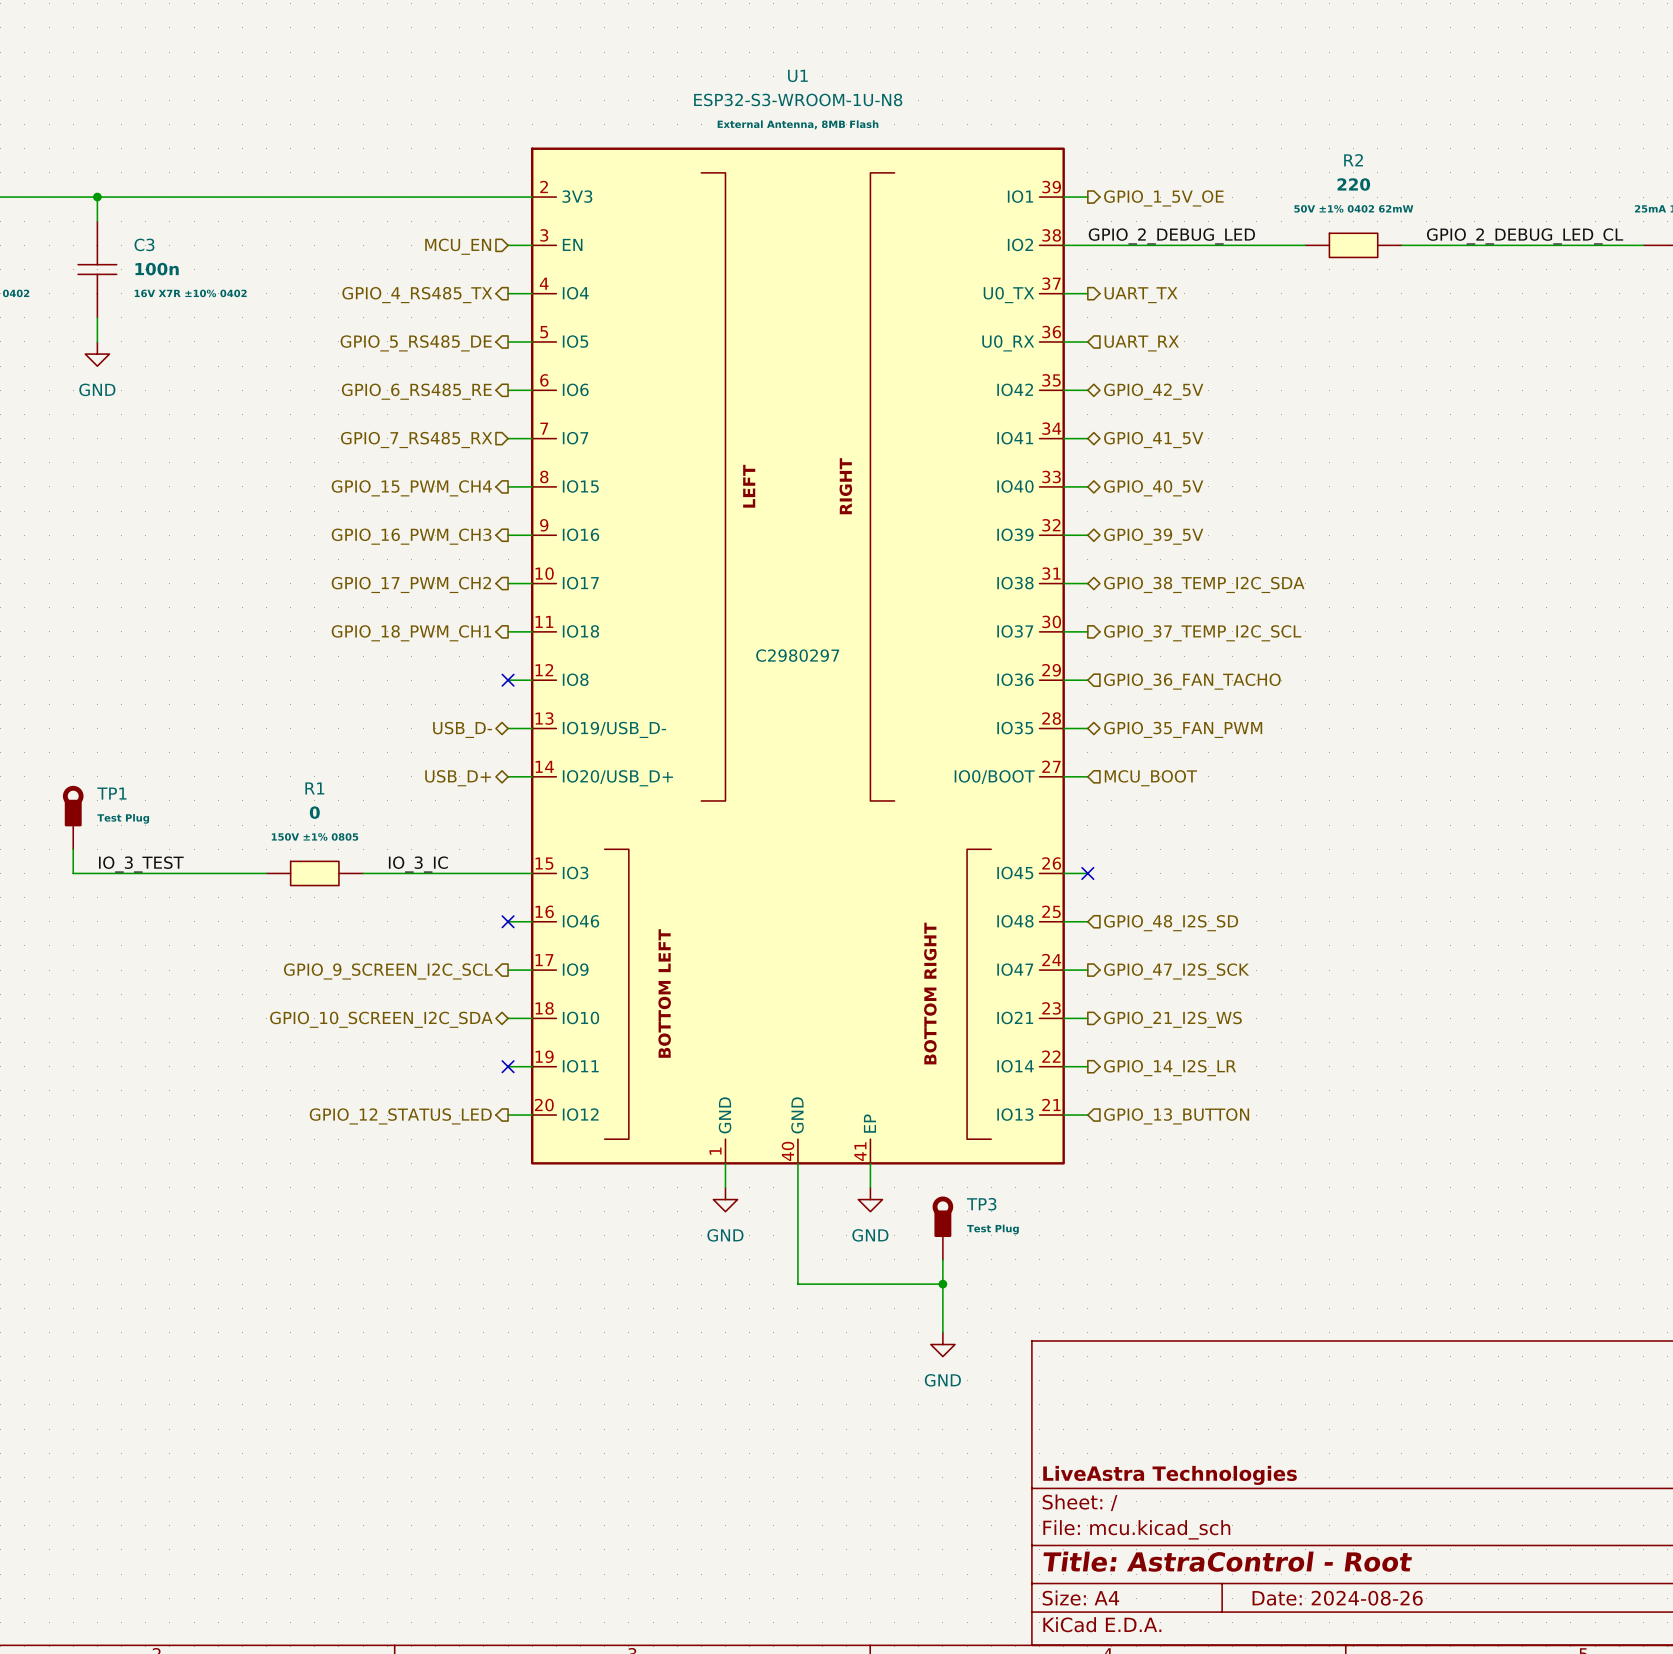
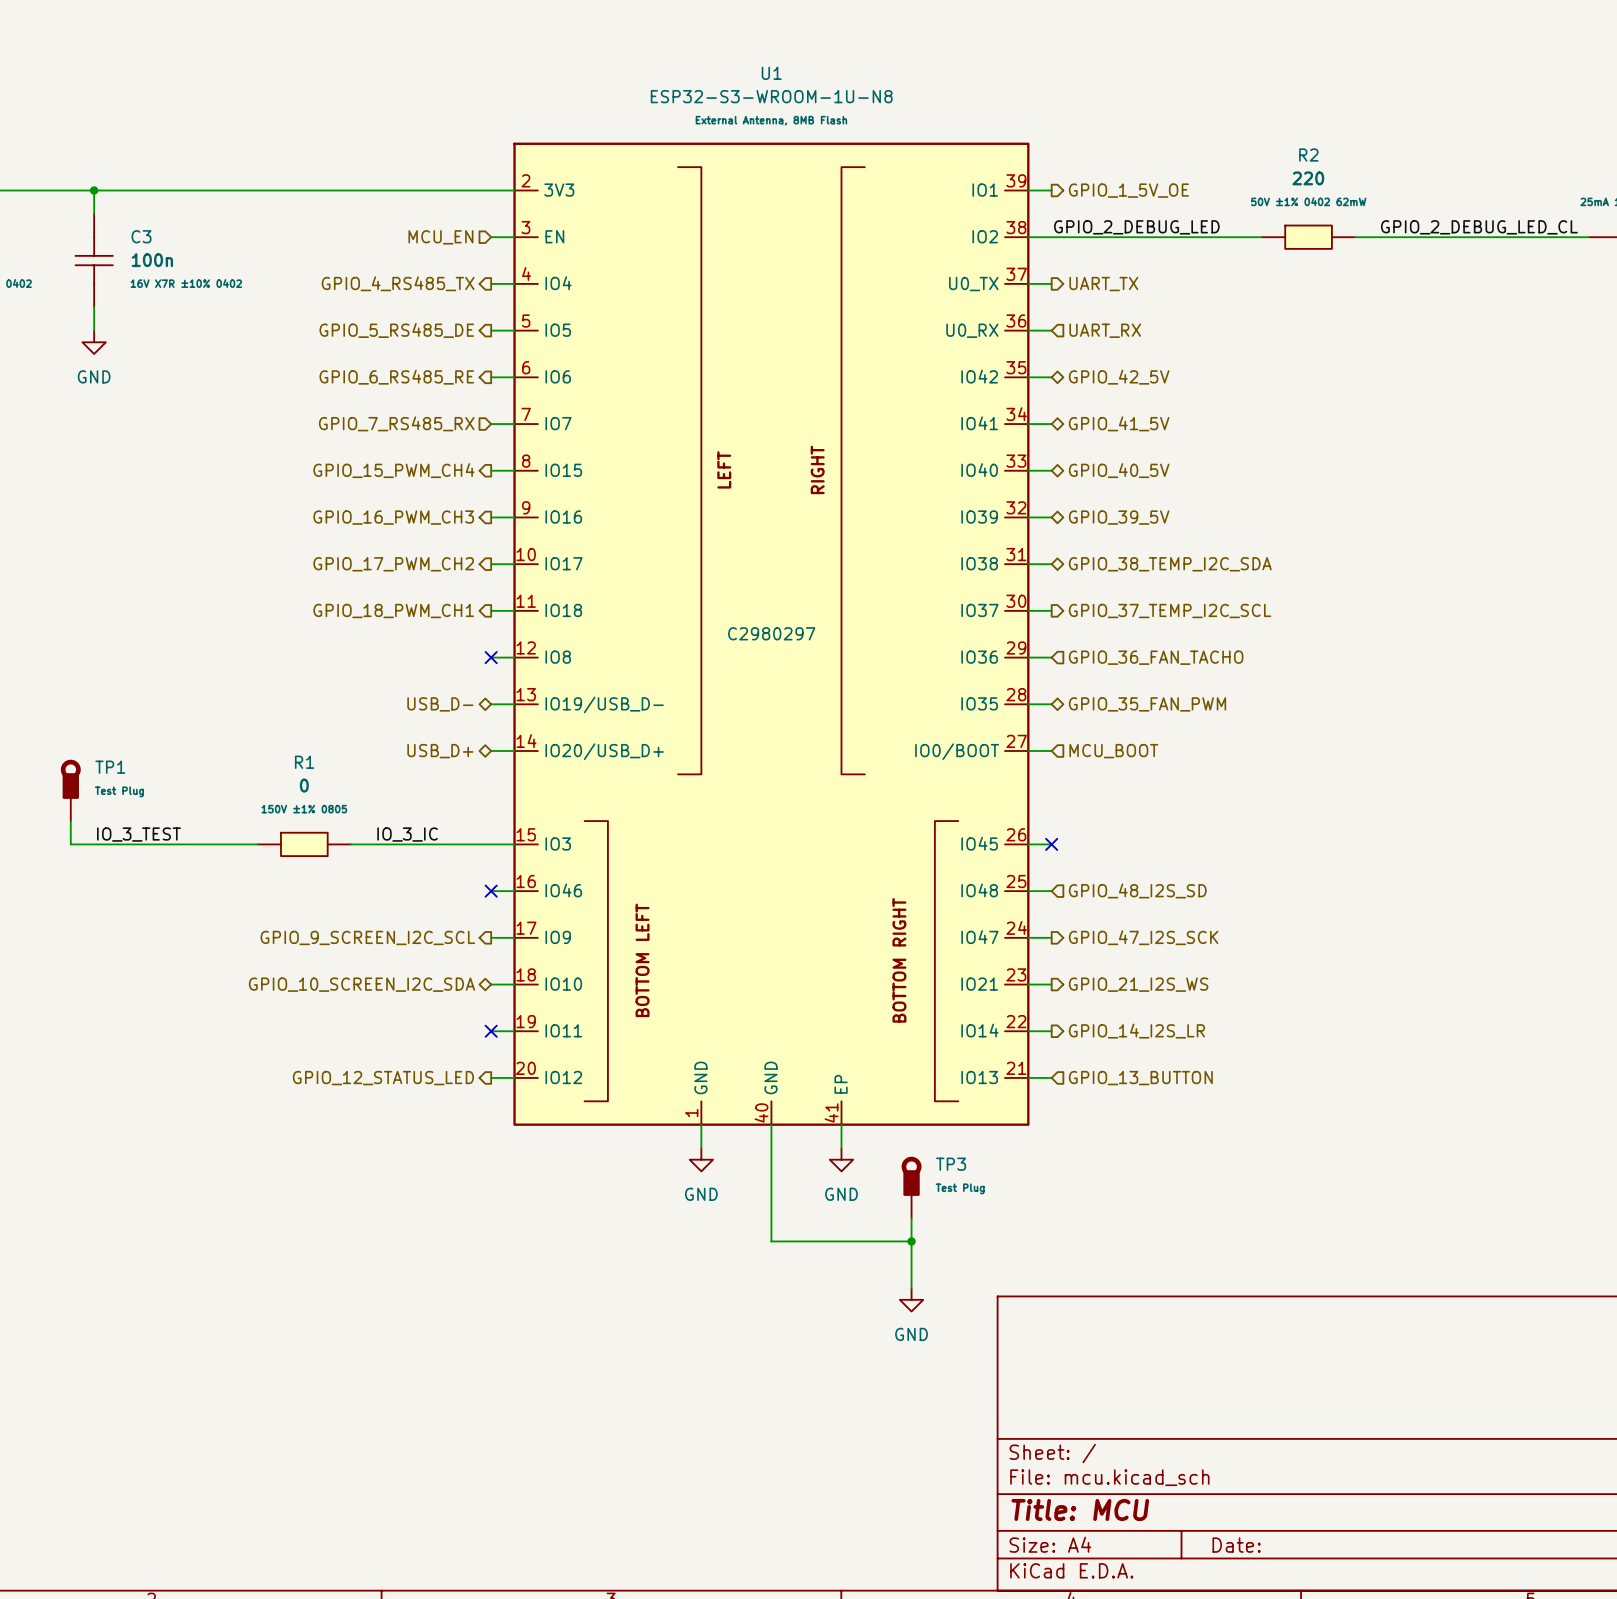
title block: LiveAstra Technologies (1170, 1475) -> none
title block: Title: AstraControl - Root (1227, 1561) -> Title: MCU (1080, 1509)
title block: Date: 2024-08-26 (1337, 1598) -> Date: (1236, 1545)

